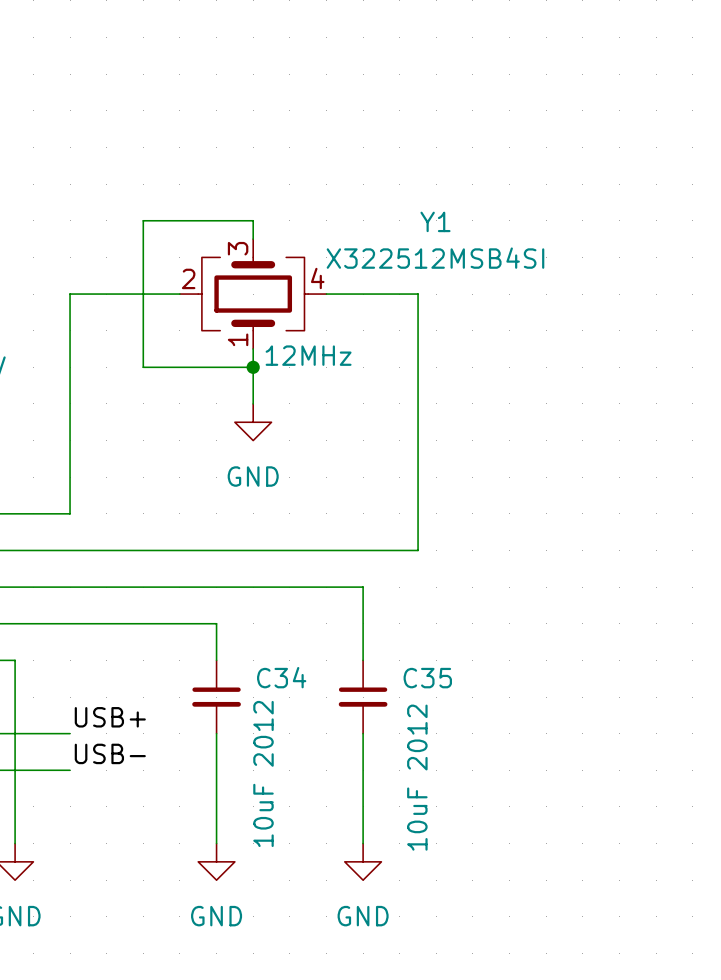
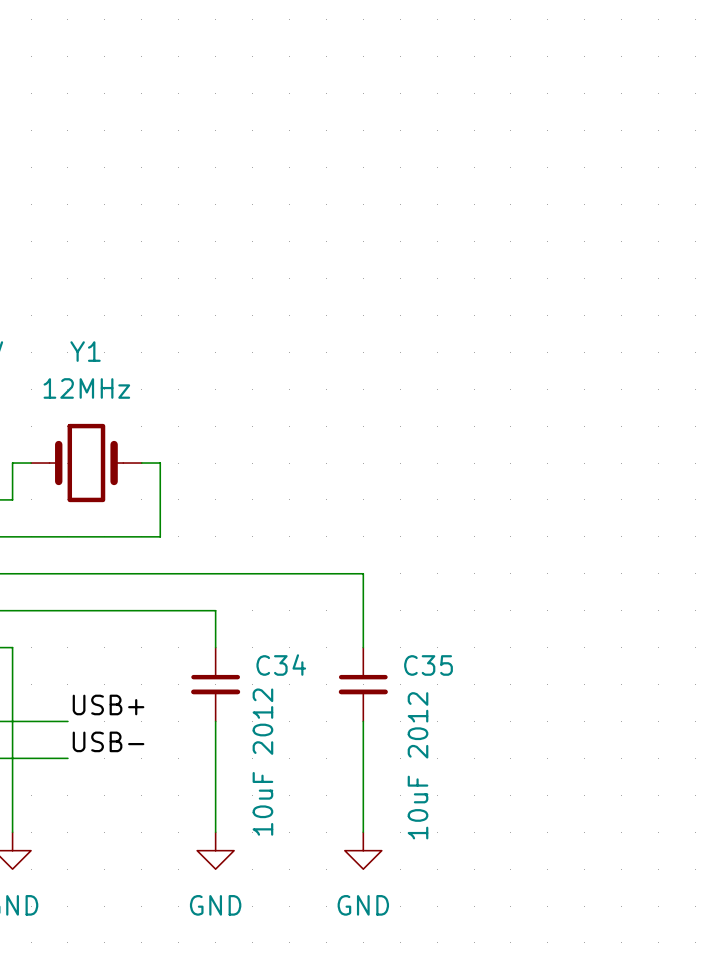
Y1 name position: Y1 (435, 221) -> Y1 (85, 351)
Y1 symbol: [179, 239, 327, 349] -> [31, 423, 142, 503]
wire: (253, 239) (253, 220) (143, 220) (143, 367) (253, 367) -> none
Y1 value: X322512MSB4SI (435, 258) -> 12MHz (86, 388)
wire: (179, 294) (70, 294) (70, 513) (15, 513) -> (31, 463) (12, 463) (12, 499)
wire: (326, 294) (418, 294) (418, 550) (161, 550) -> (141, 463) (160, 463) (160, 536)
wire: (253, 348) (253, 403) -> none
Y1 text: 12MHz (308, 355) -> none
junction: (253, 367) -> none
power symbol: GND (253, 422) -> none

